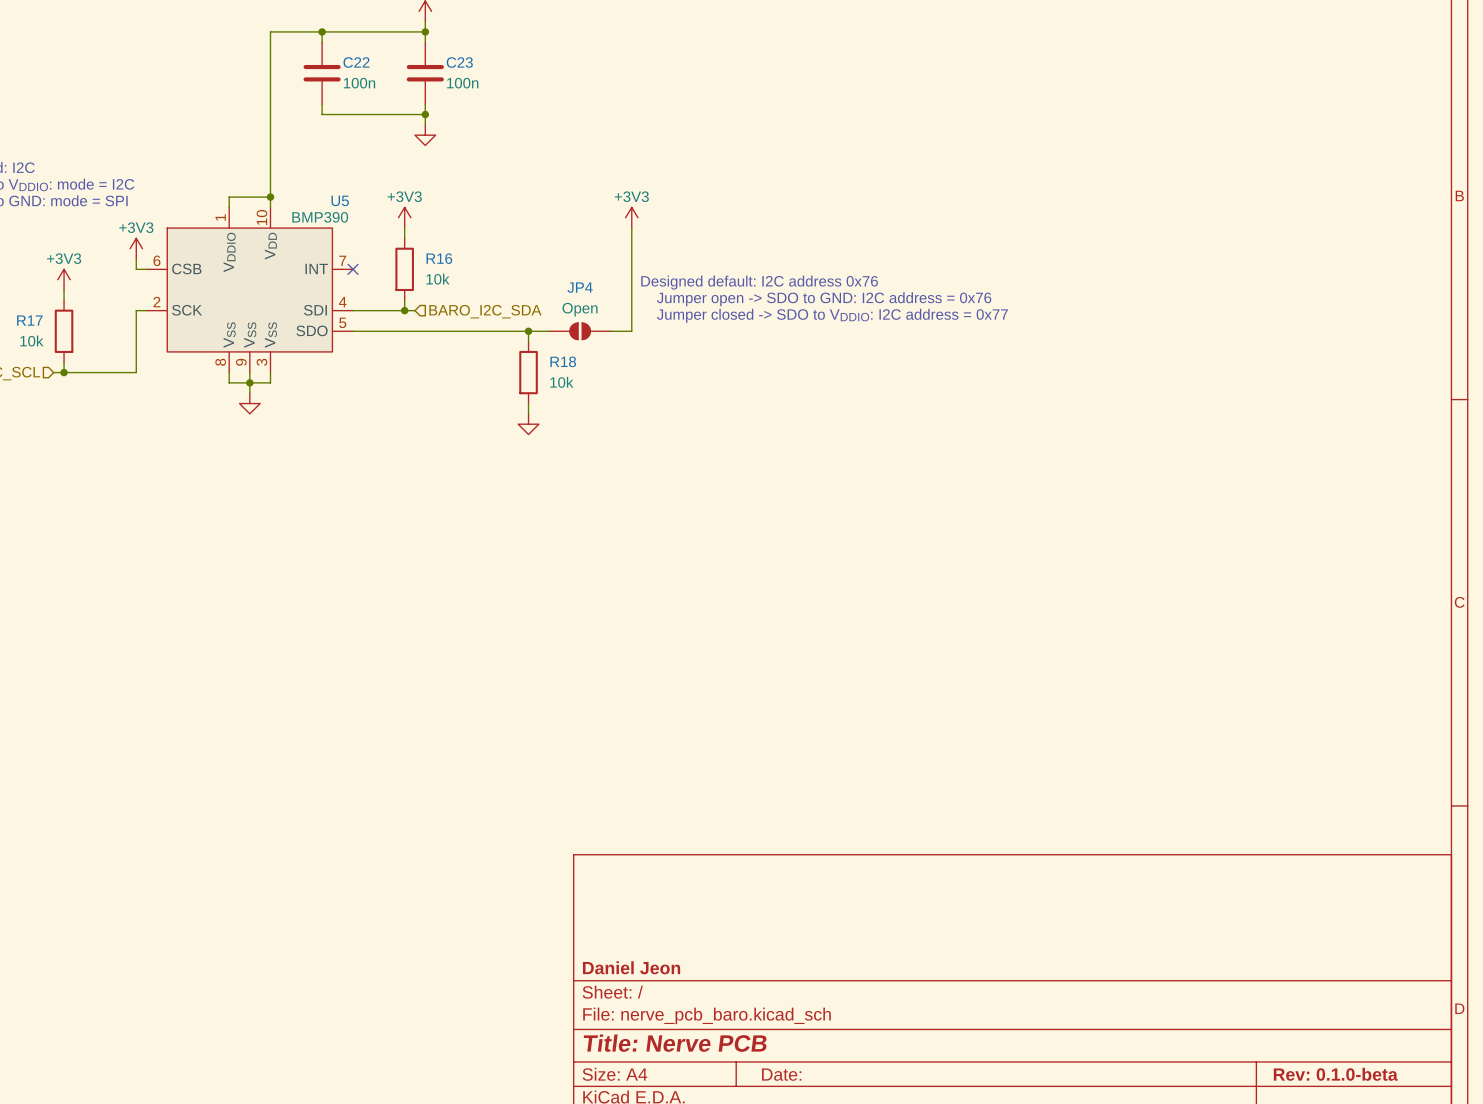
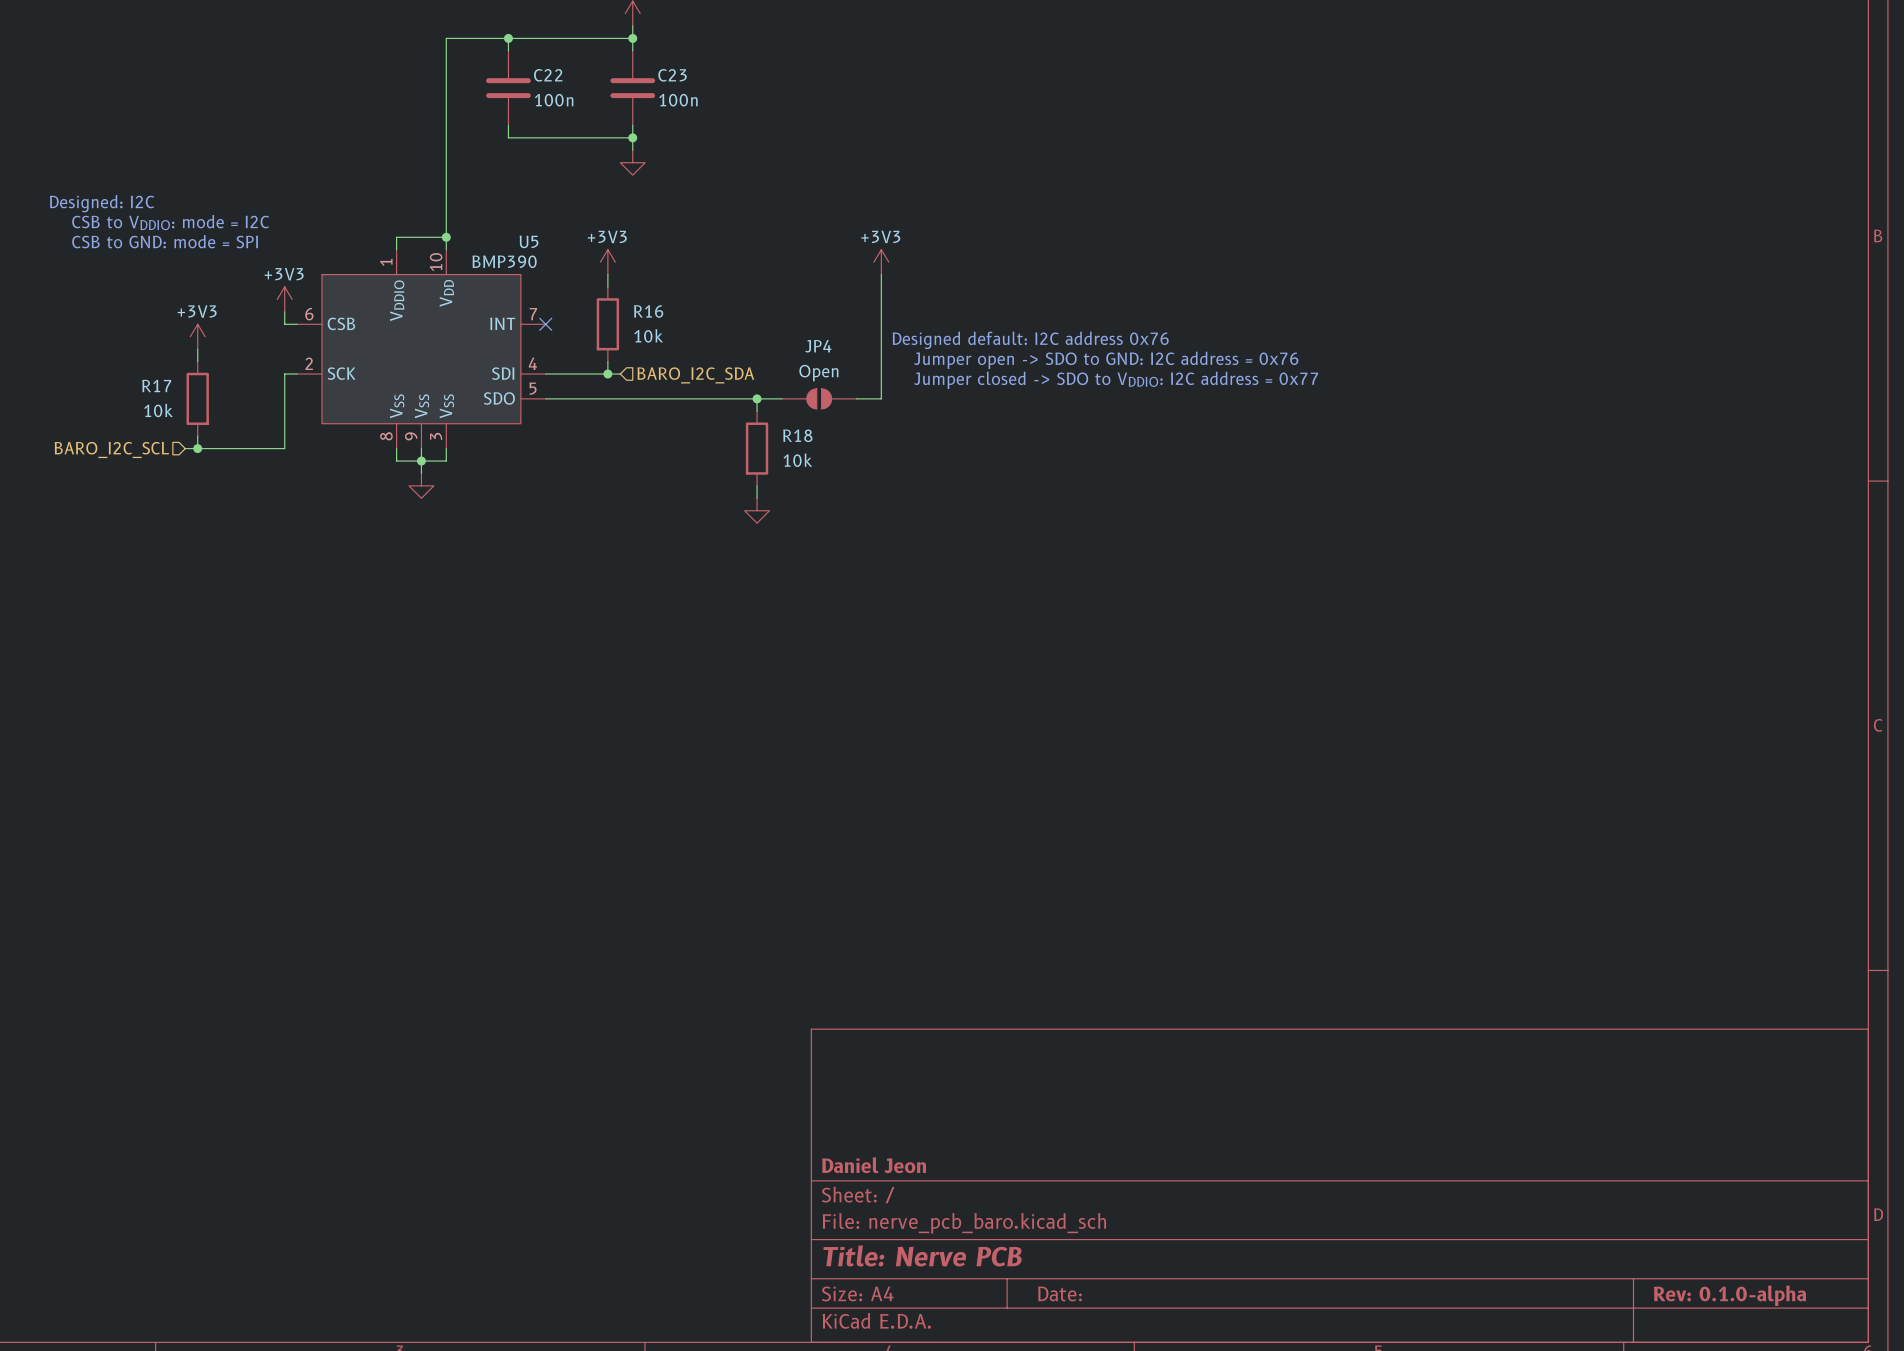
title block: Rev: 0.1.0-beta (1335, 1074) -> Rev: 0.1.0-alpha (1730, 1295)

